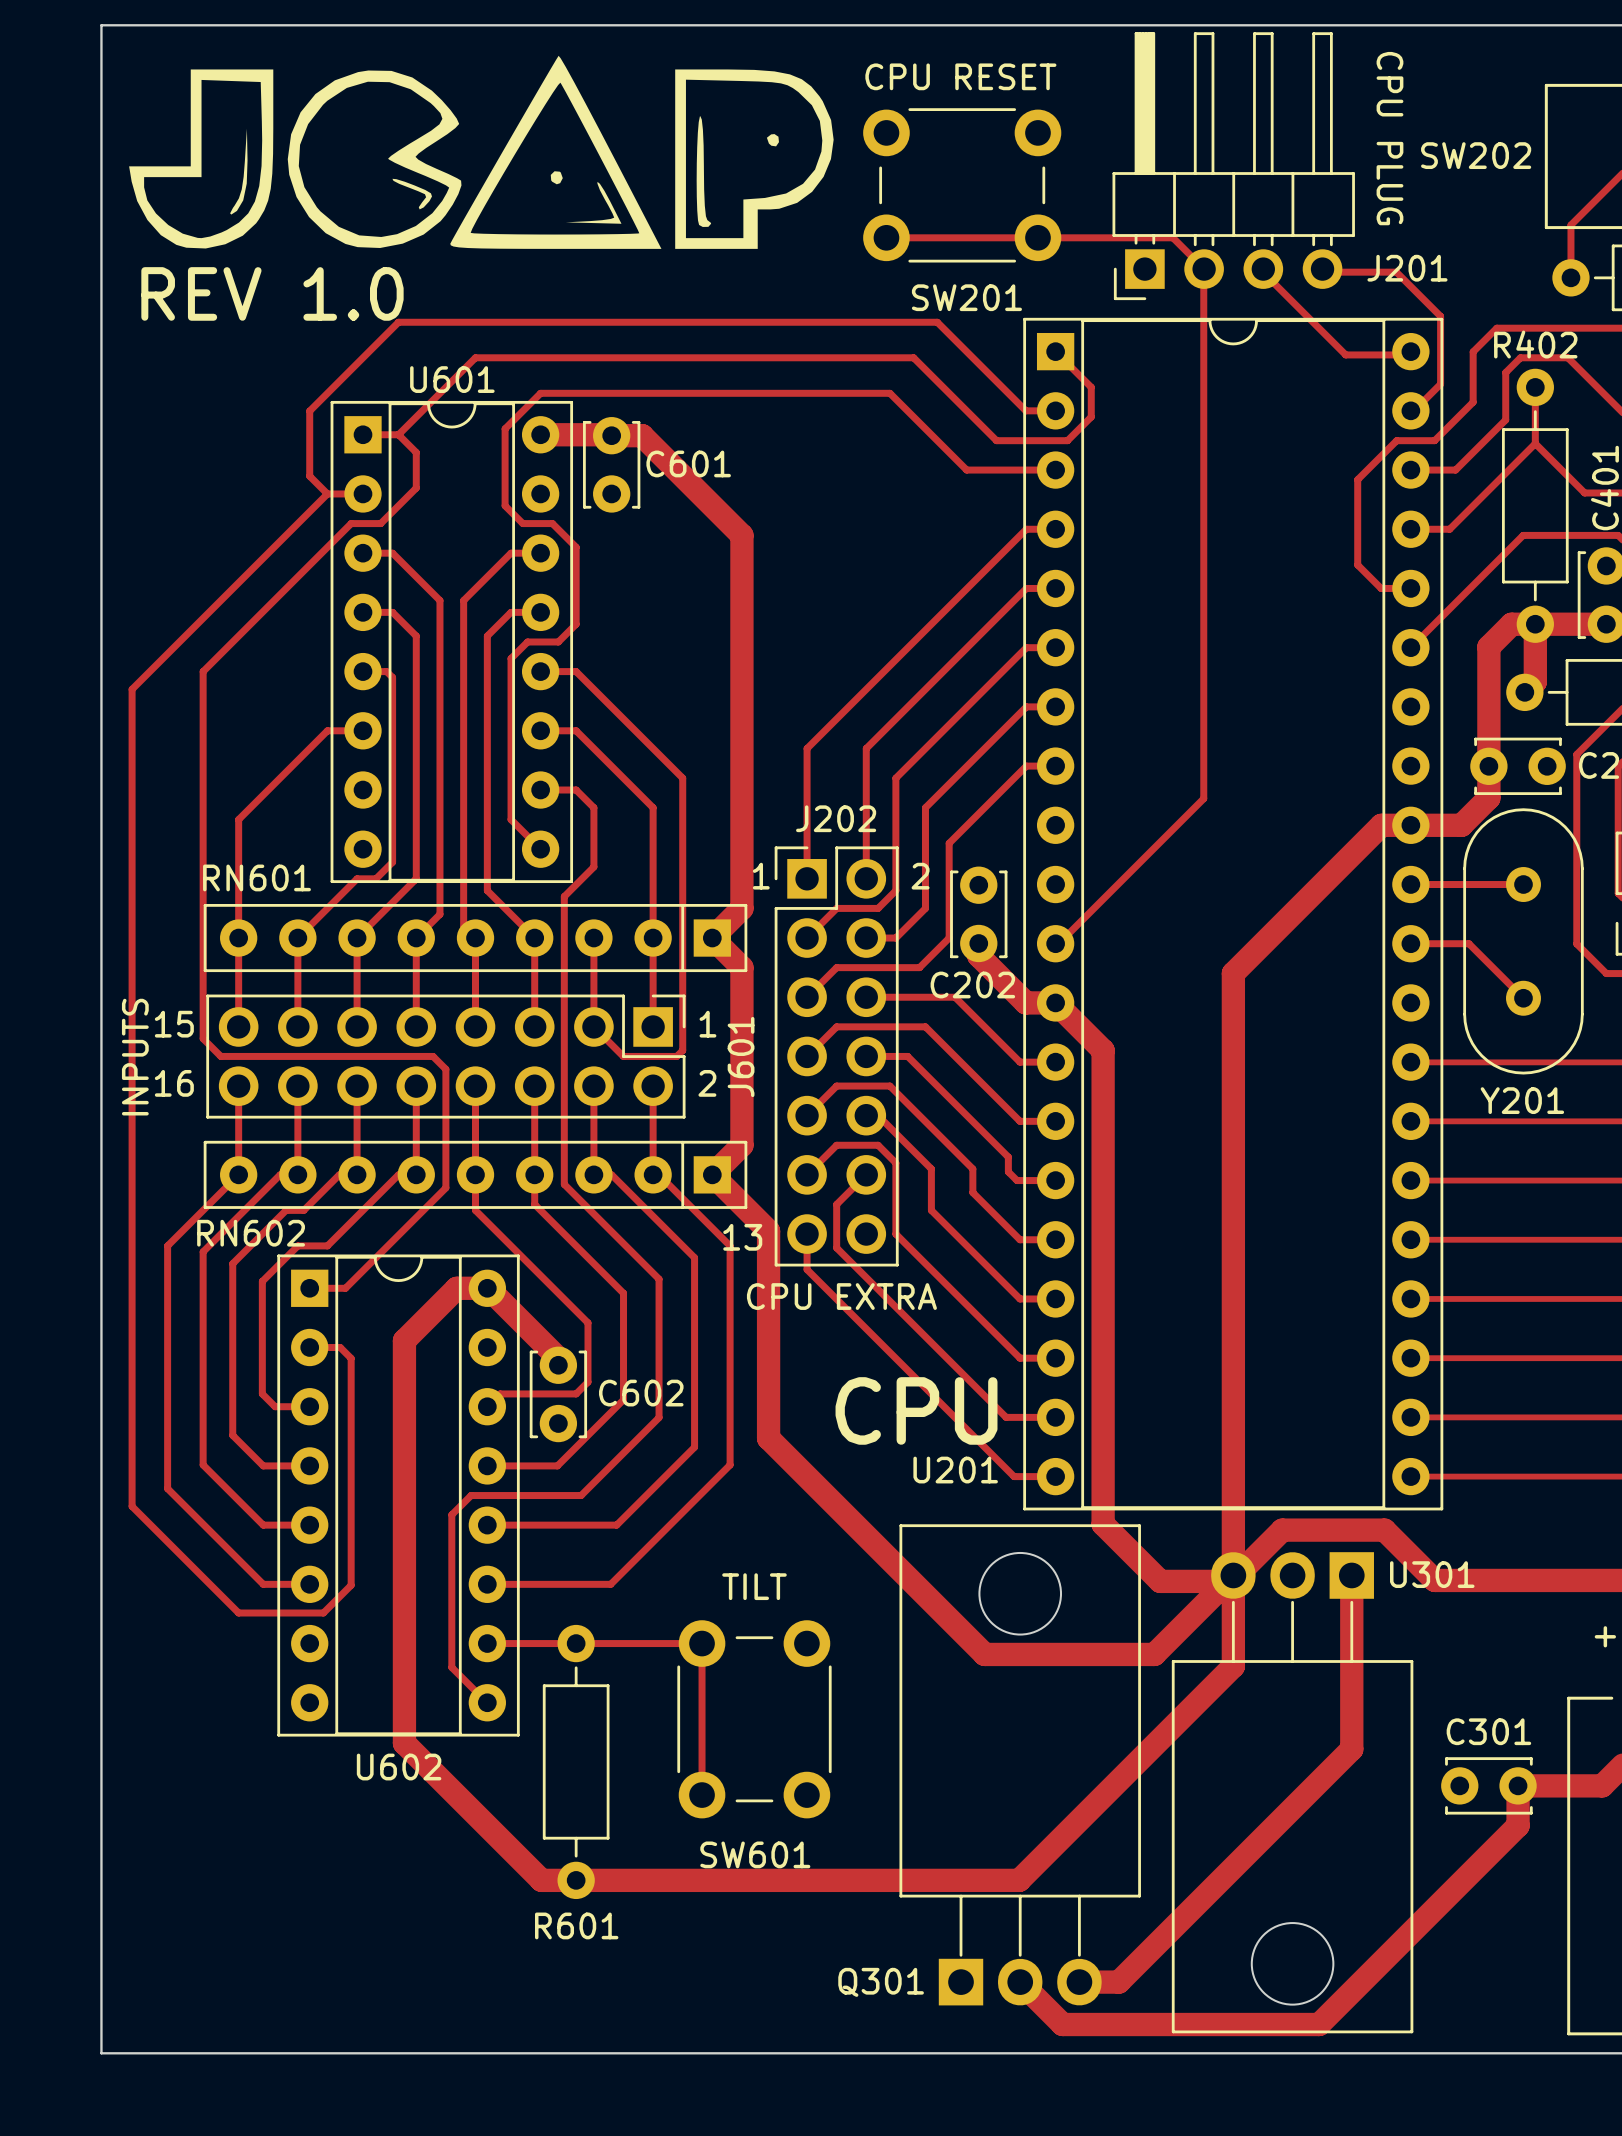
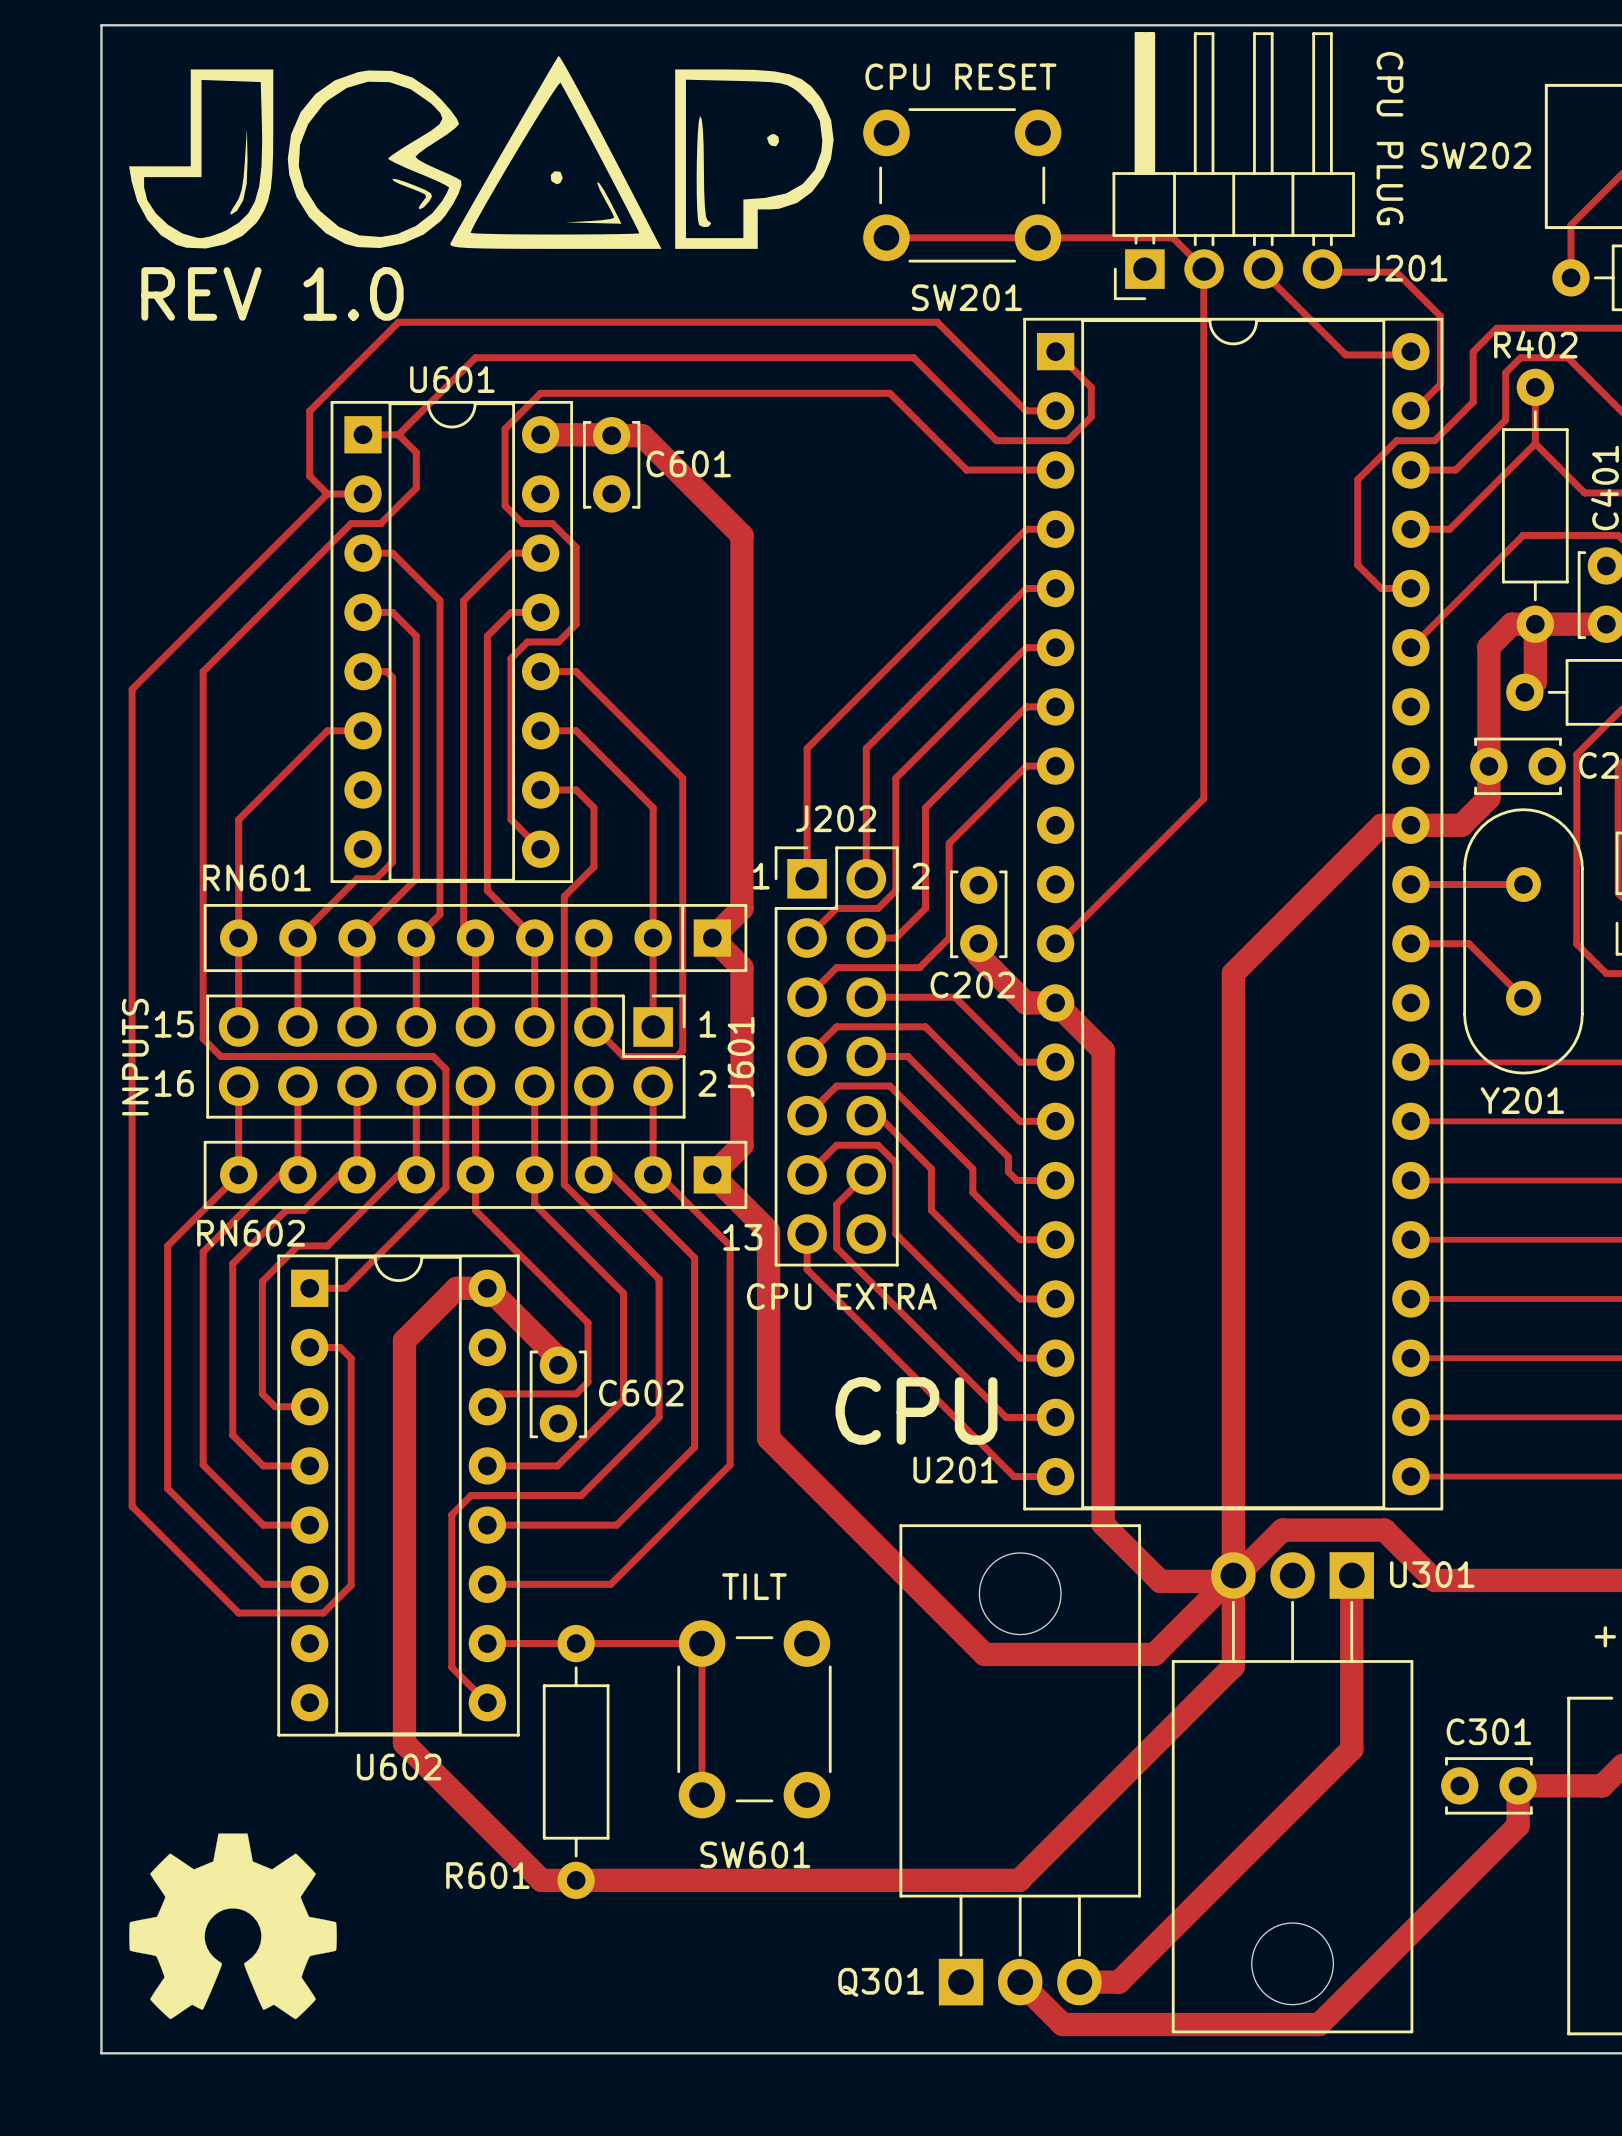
drawing: none -> [129, 1833, 337, 2020]
R601 name position: R601 (576, 1925) -> R601 (487, 1875)

